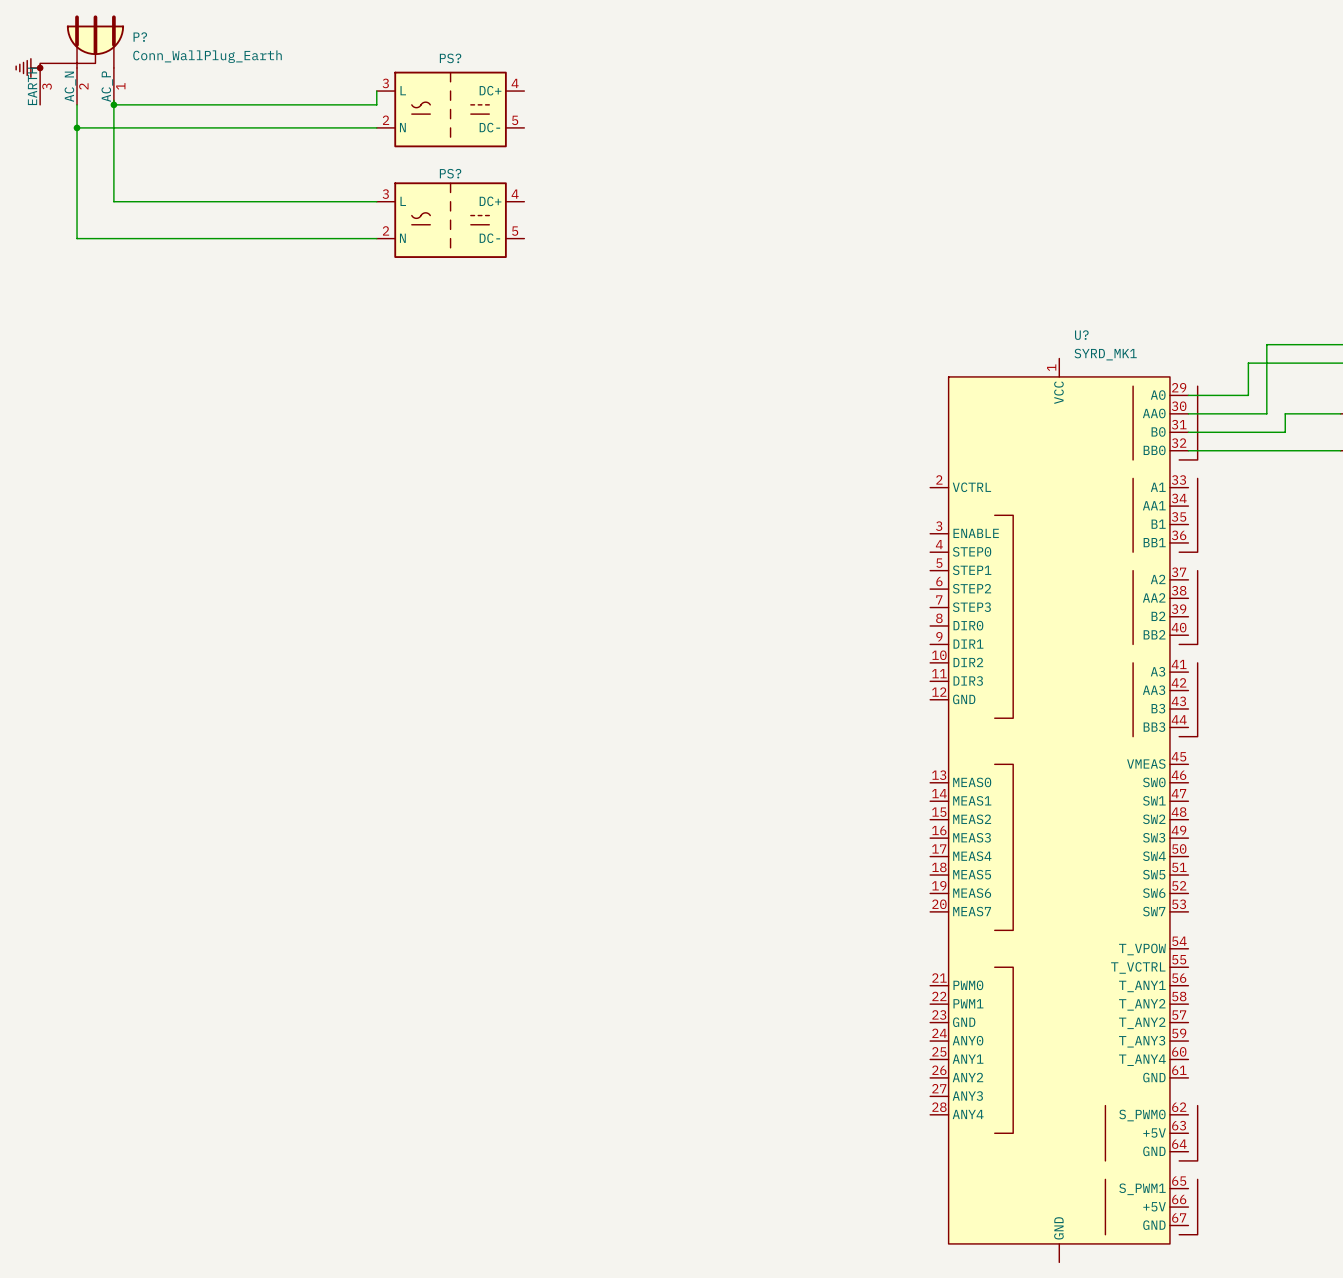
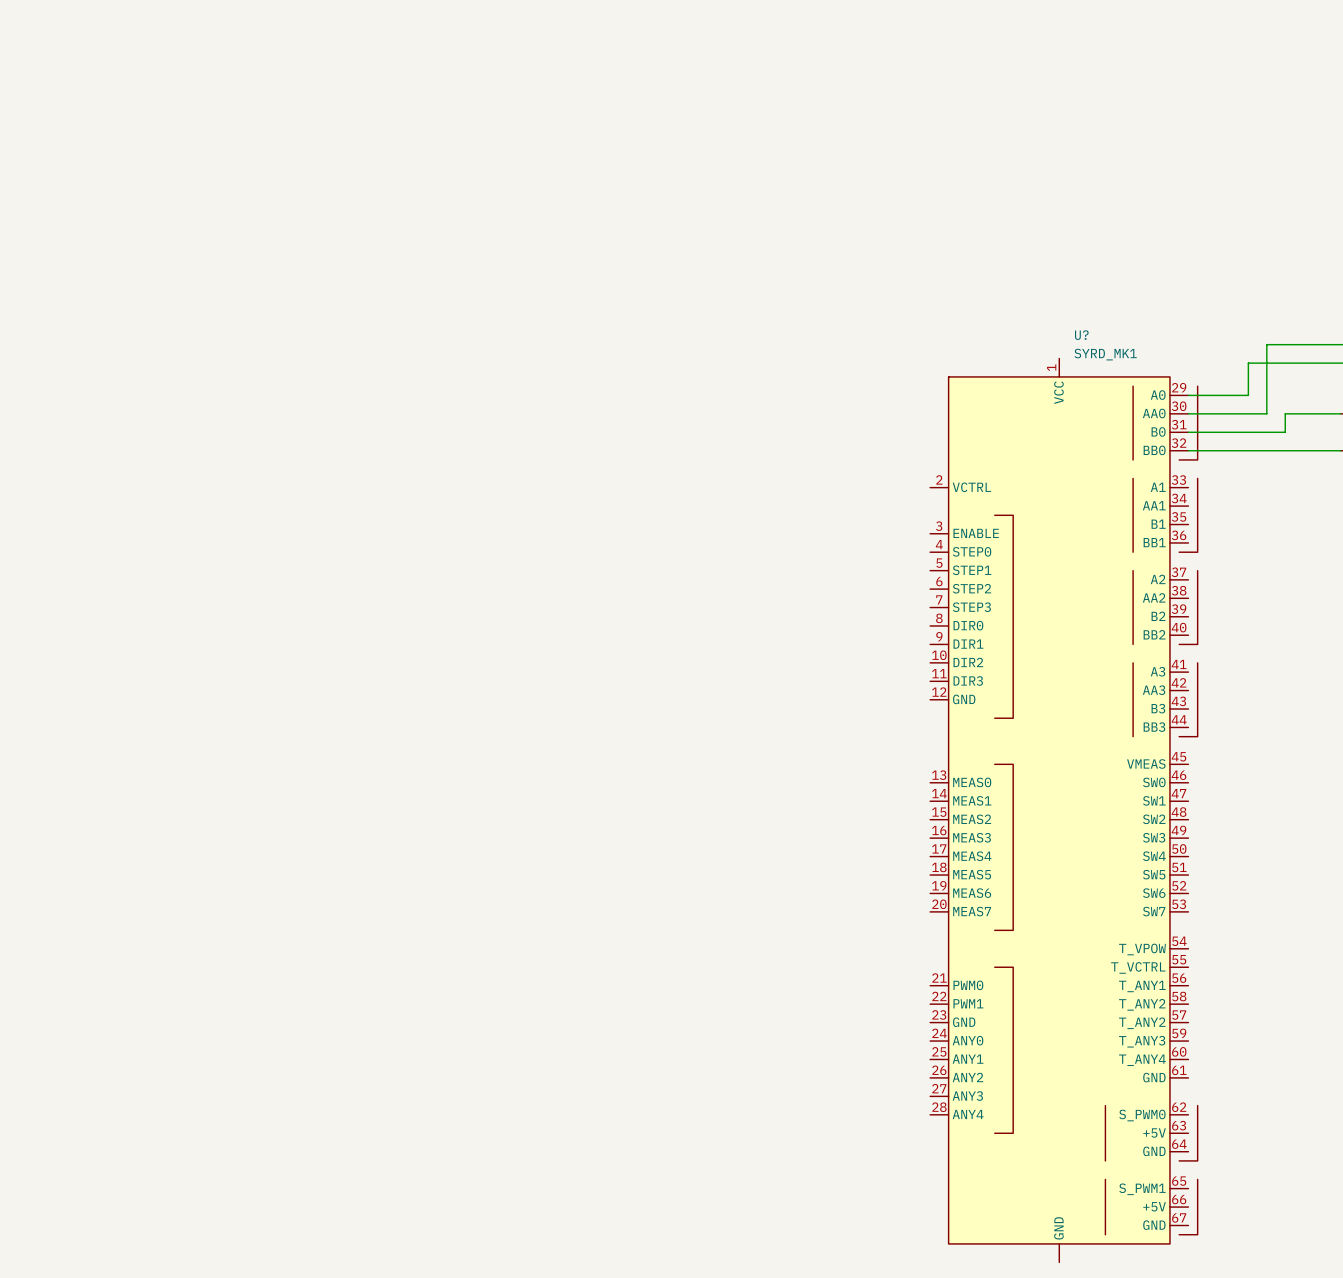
P?: Conn_WallPlug_Earth (69, 60) -> none
wire: (376, 91) (376, 104) (113, 104) -> none
wire: (113, 100) (113, 201) (376, 201) -> none
wire: (77, 104) (77, 238) (376, 238) -> none
junction: (113, 104) -> none
PS?: (450, 109) -> none
wire: (77, 127) (376, 127) -> none
junction: (77, 127) -> none
PS?: (450, 220) -> none

